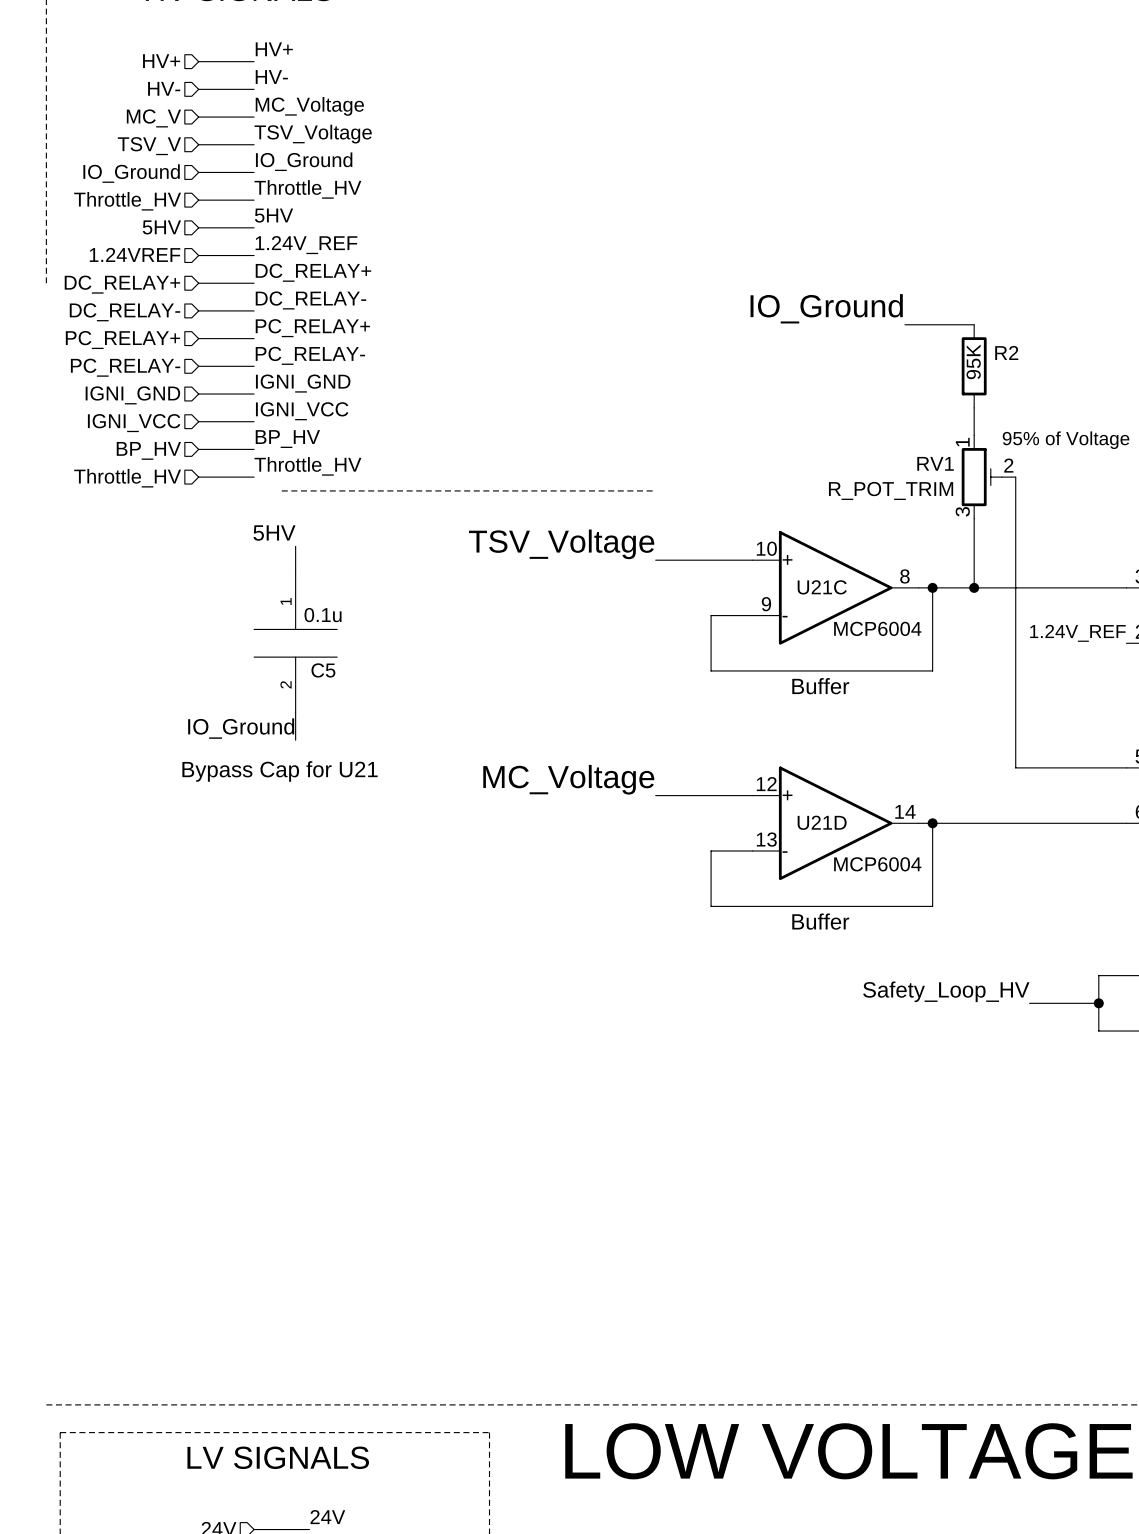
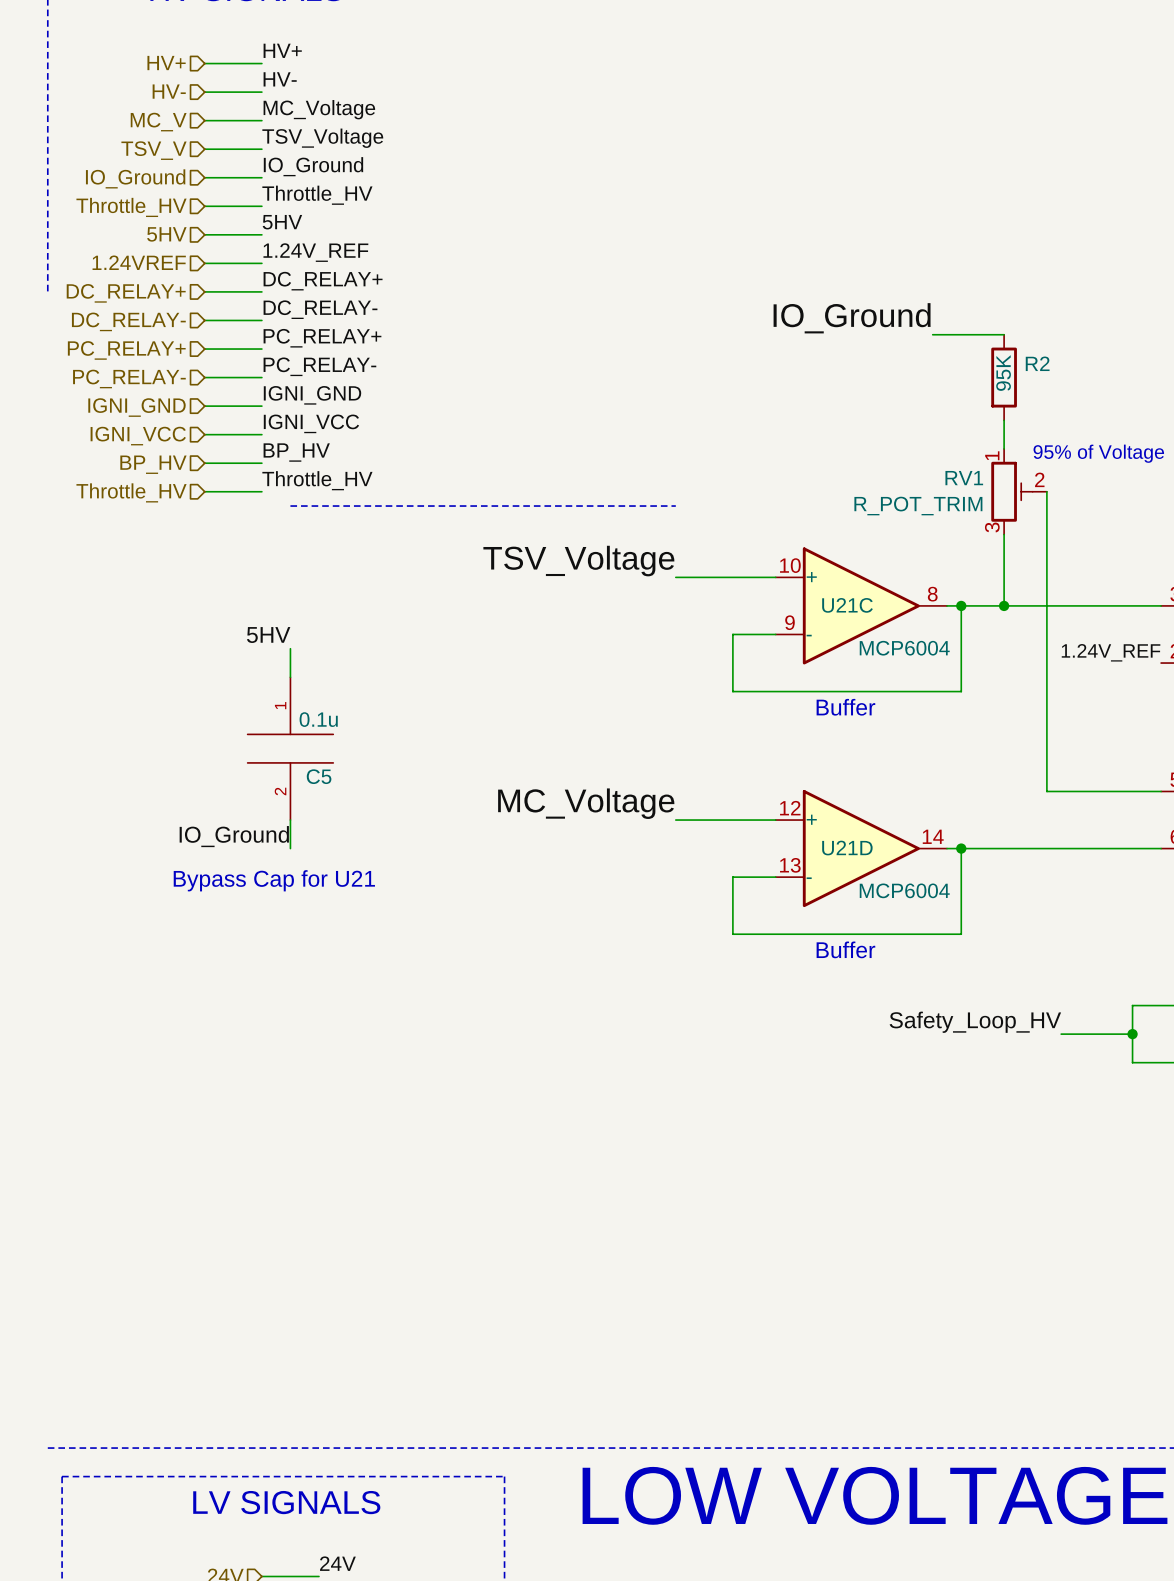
label position: 5HV (274, 533) -> 5HV (268, 635)
wire: (295, 546) (295, 574) -> (290, 648) (290, 677)
C5 position: (295, 643) -> (290, 748)
wire: (295, 712) (295, 740) -> (290, 820) (290, 848)
label position: IO_Ground (241, 728) -> IO_Ground (234, 836)
text position: Bypass Cap for U21 (280, 771) -> Bypass Cap for U21 (274, 880)

